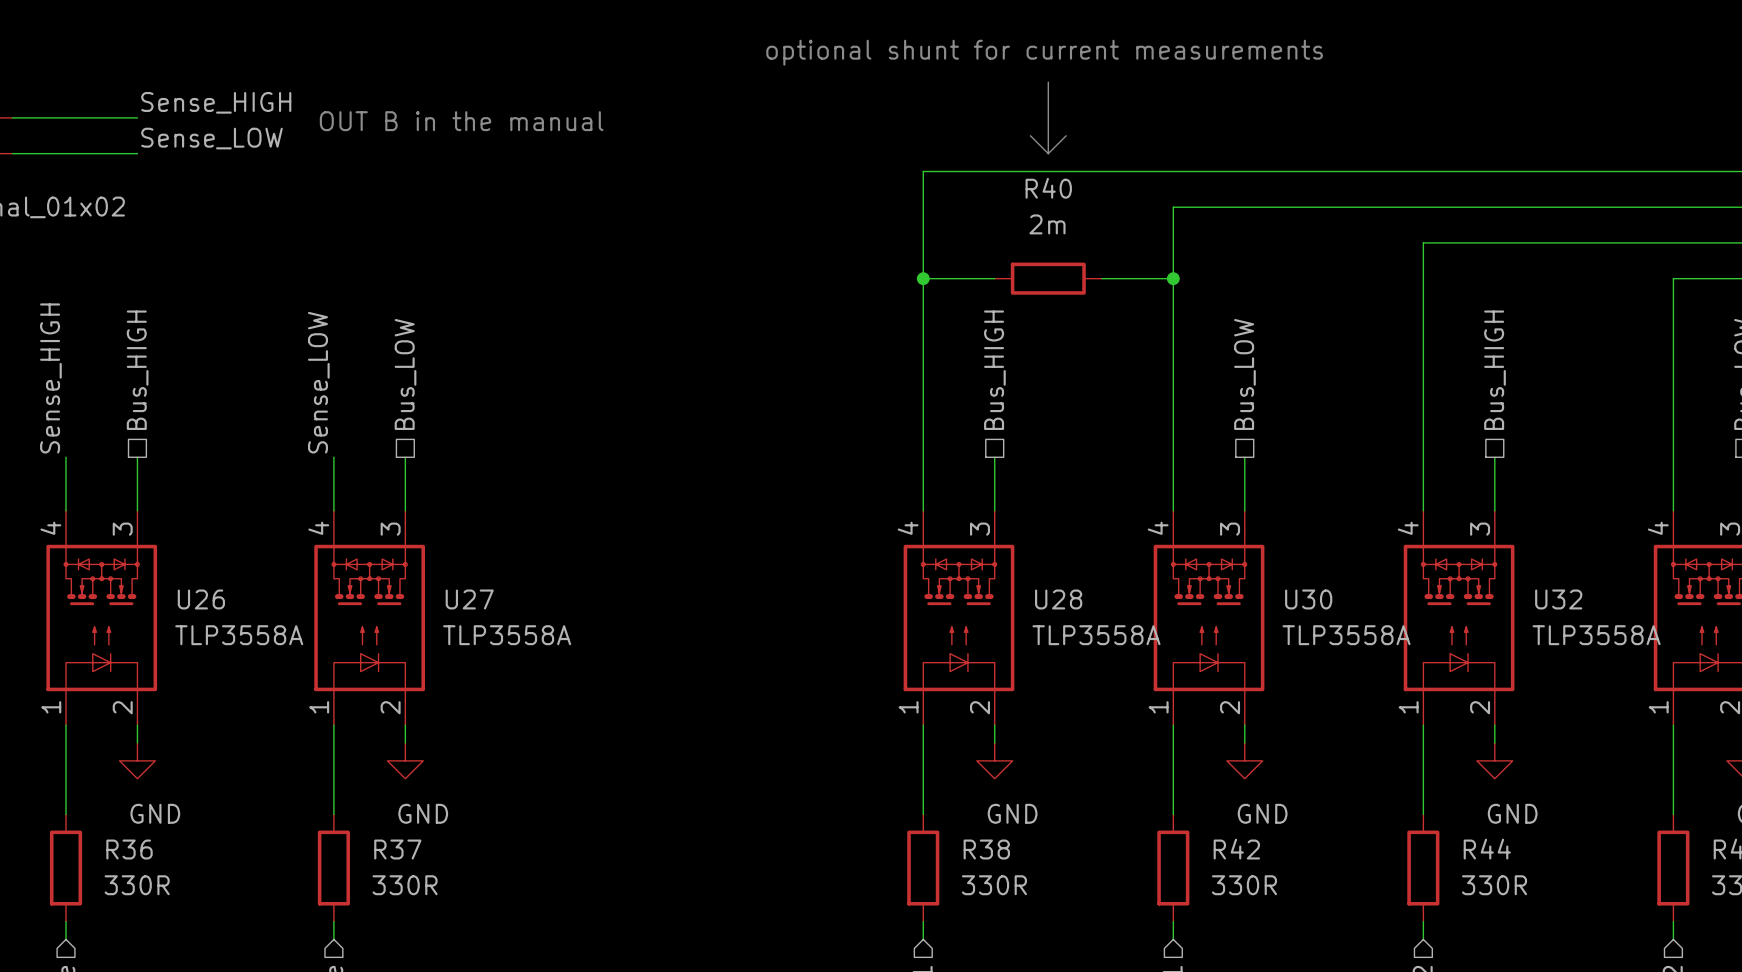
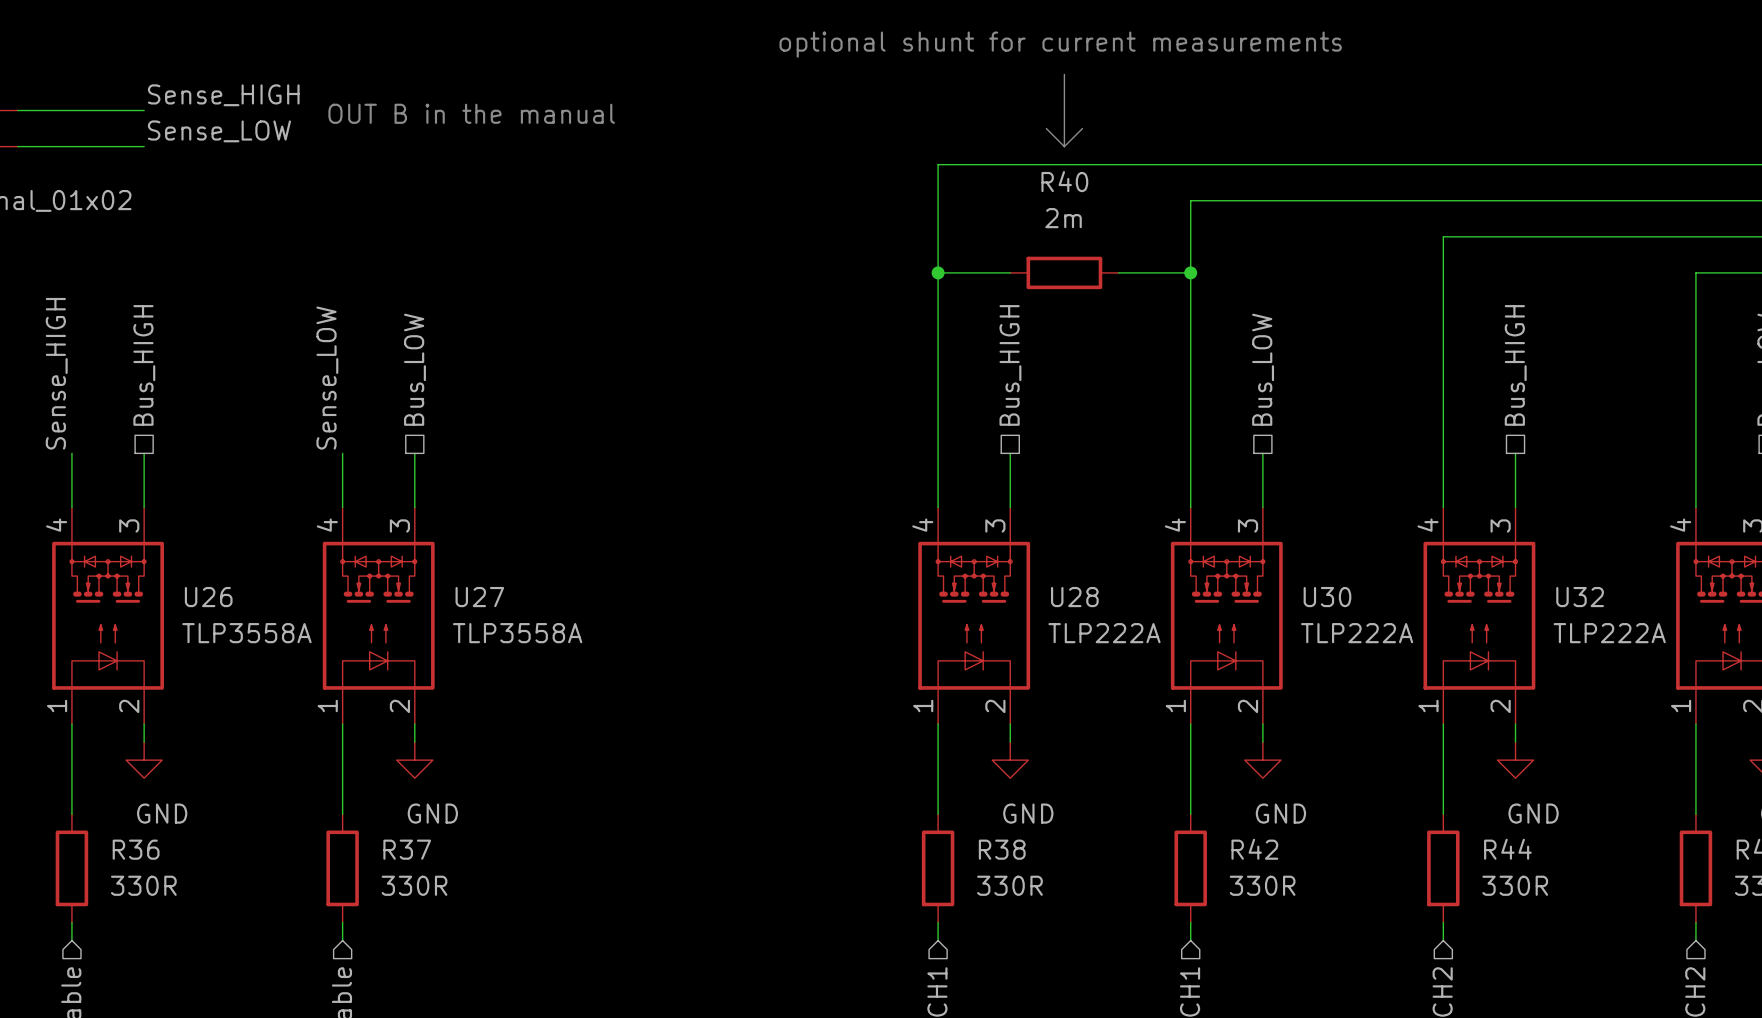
U28 value: TLP3558A (1096, 635) -> TLP222A (1104, 633)
U30 value: TLP3558A (1346, 635) -> TLP222A (1357, 633)
U32 value: TLP3558A (1596, 635) -> TLP222A (1609, 633)

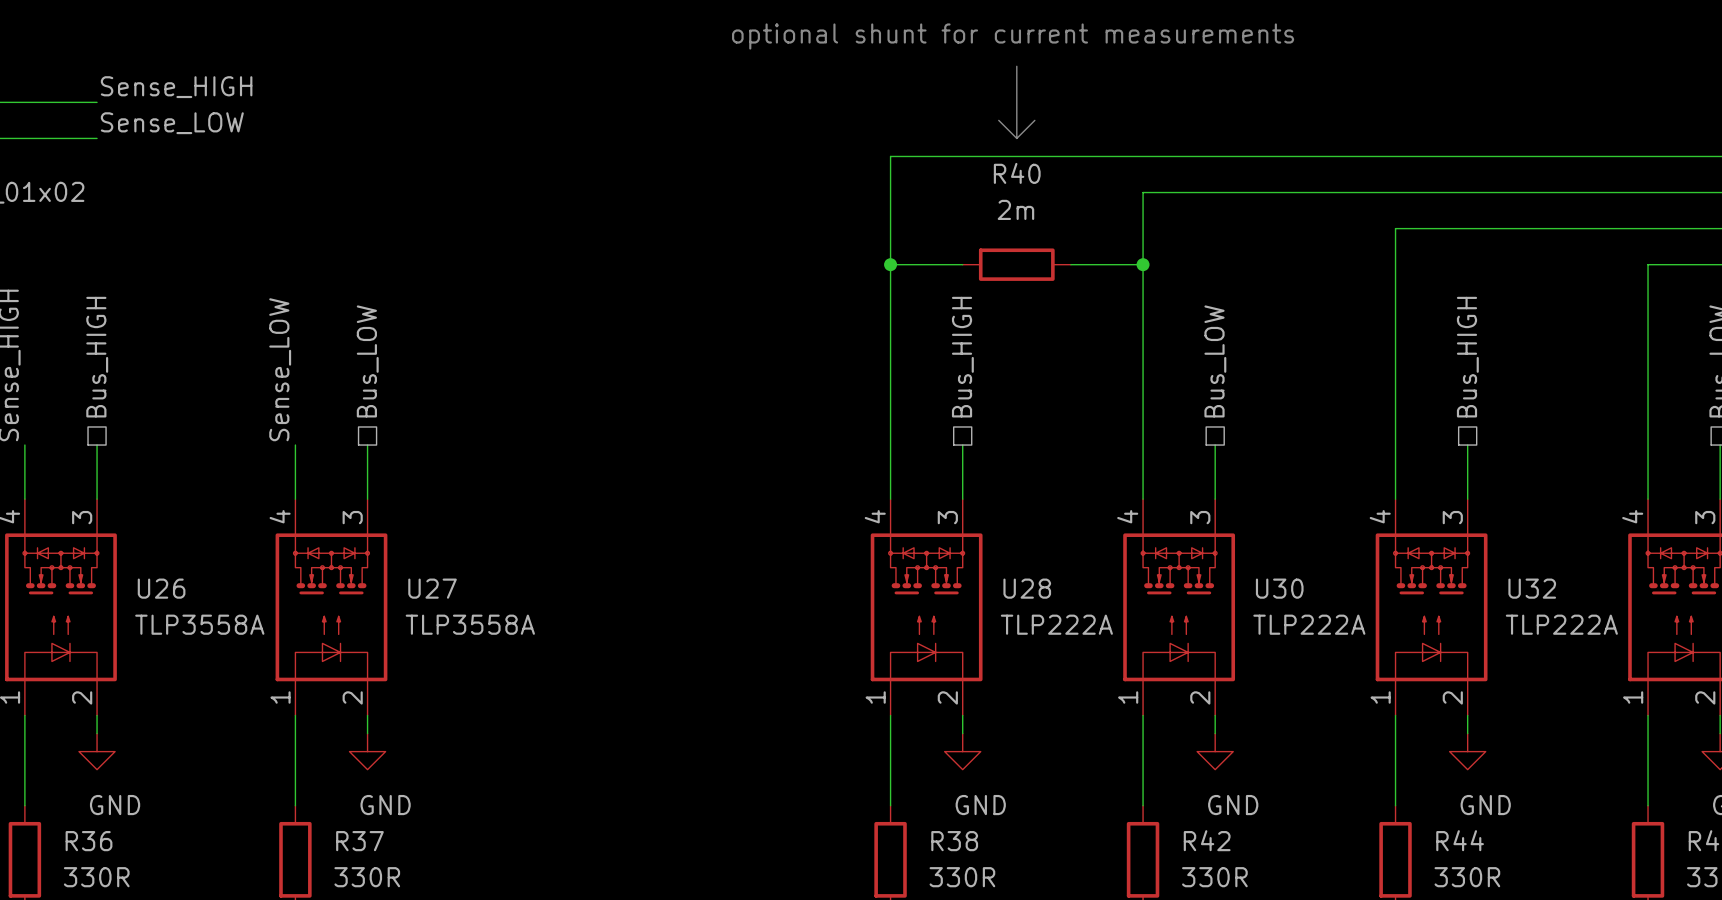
text: OUT B in the manual (471, 113) -> none

